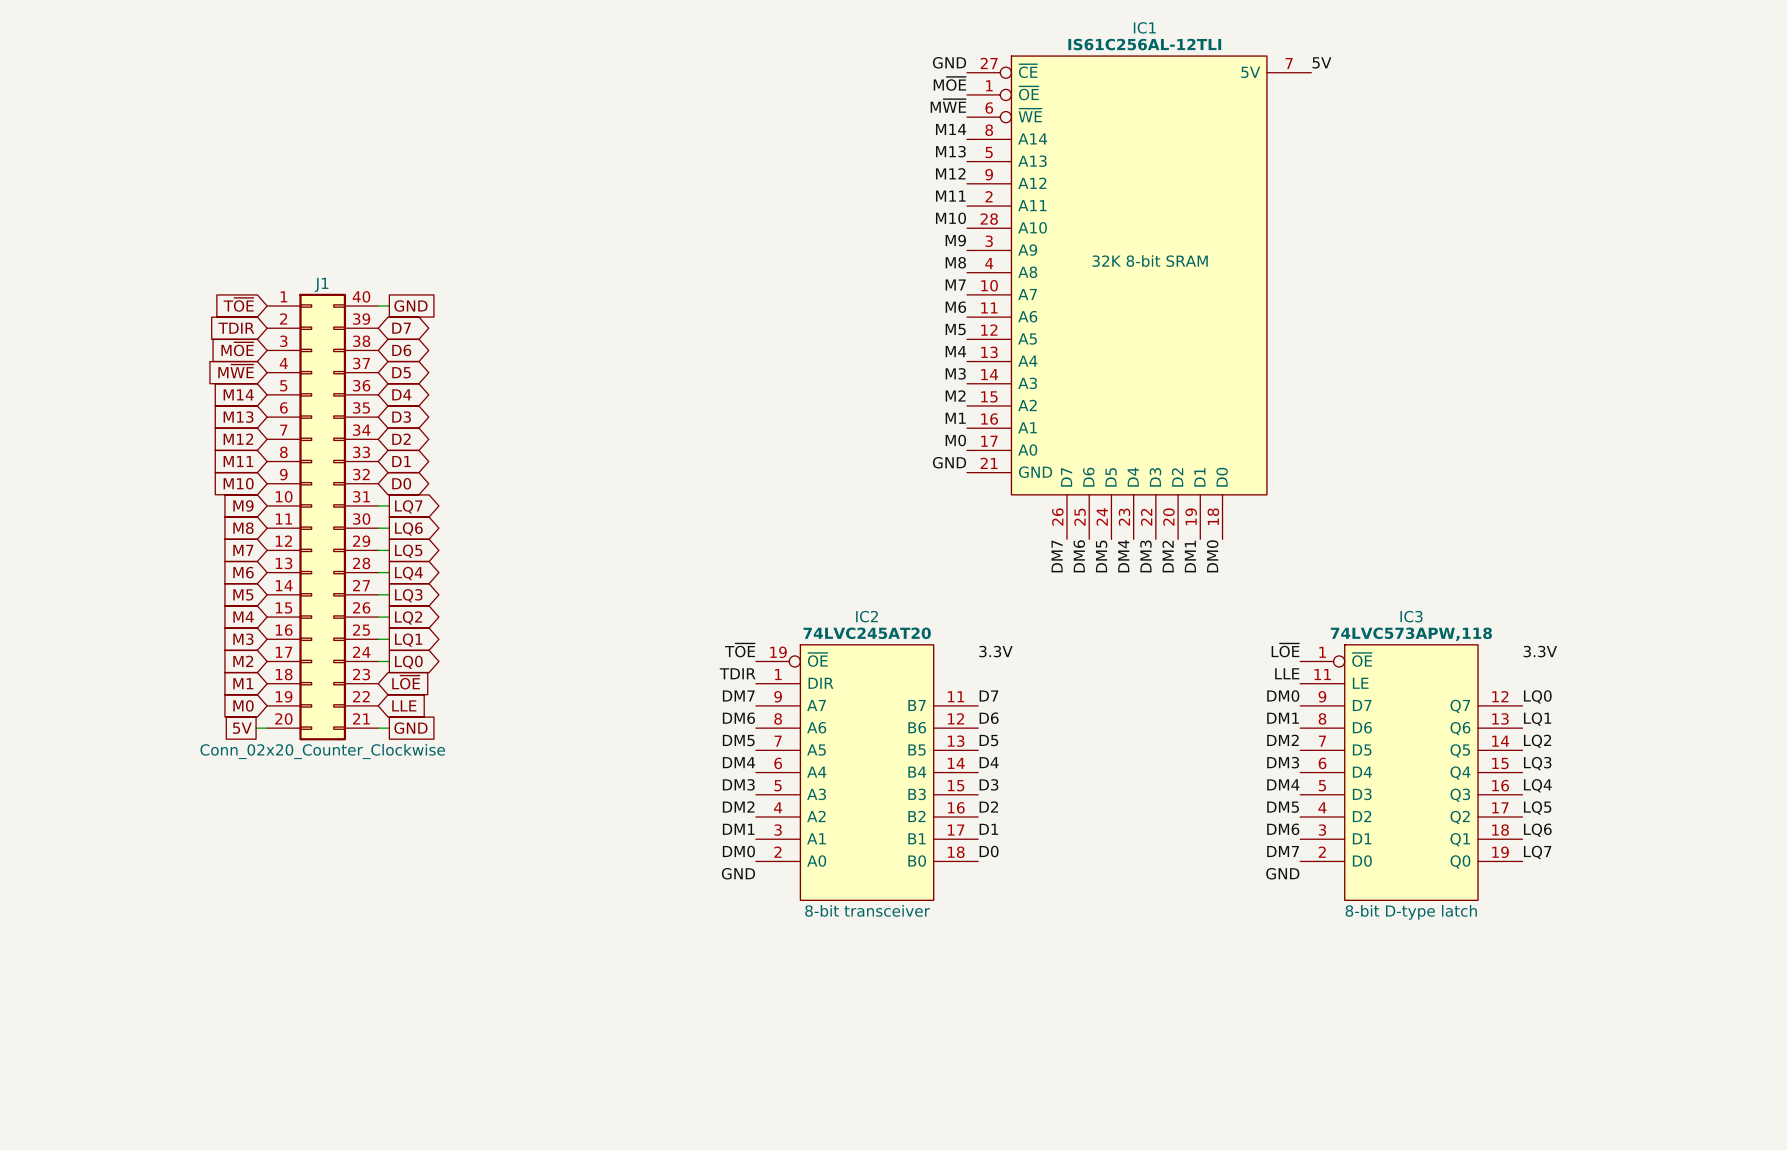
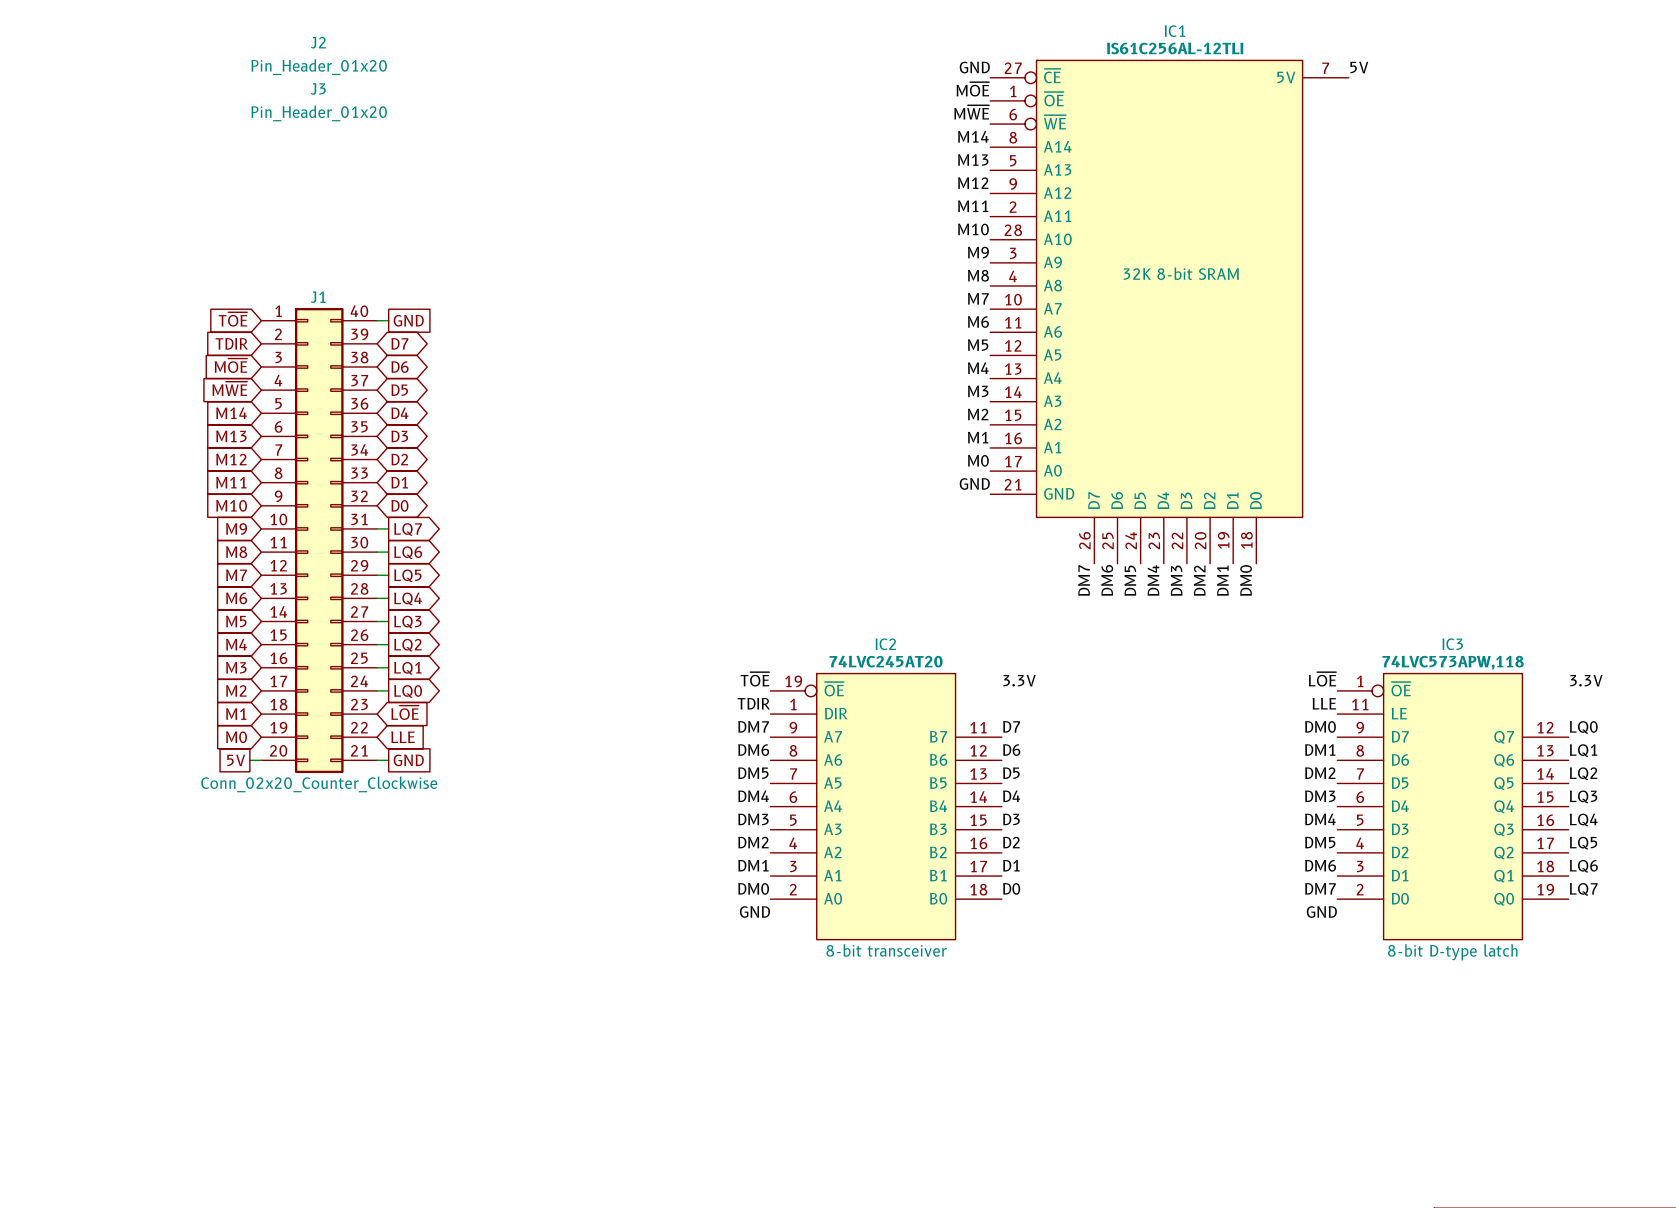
J2: none -> Pin_Header_01x20 (319, 55)
J3: none -> Pin_Header_01x20 (319, 102)

